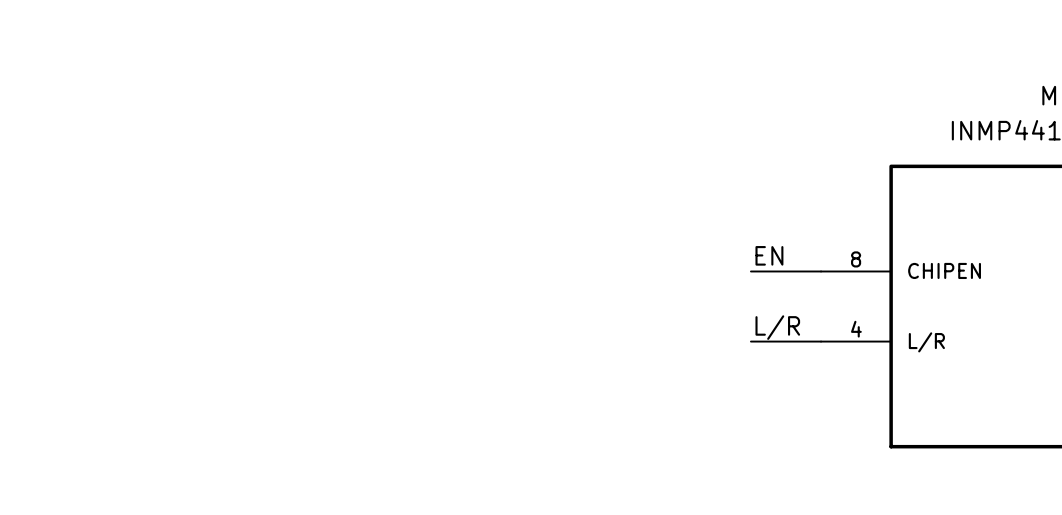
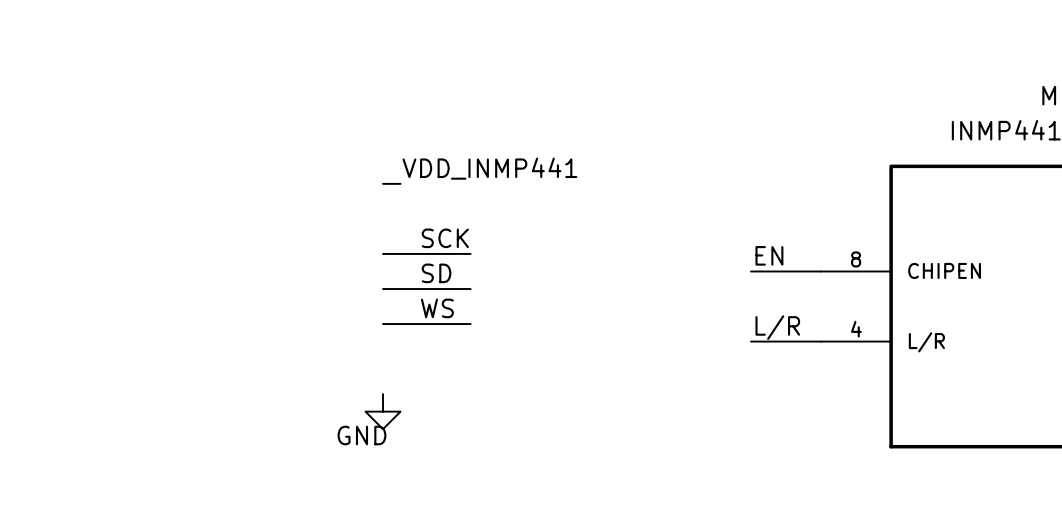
label: none -> VDD_INMP441 (489, 168)
wire: none -> (383, 183) (400, 183)
label: none -> SCK (445, 238)
wire: none -> (383, 253) (470, 253)
label: none -> SD (436, 273)
wire: none -> (383, 289) (470, 289)
label: none -> WS (437, 308)
wire: none -> (383, 324) (470, 324)
power symbol: none -> GND (383, 411)

